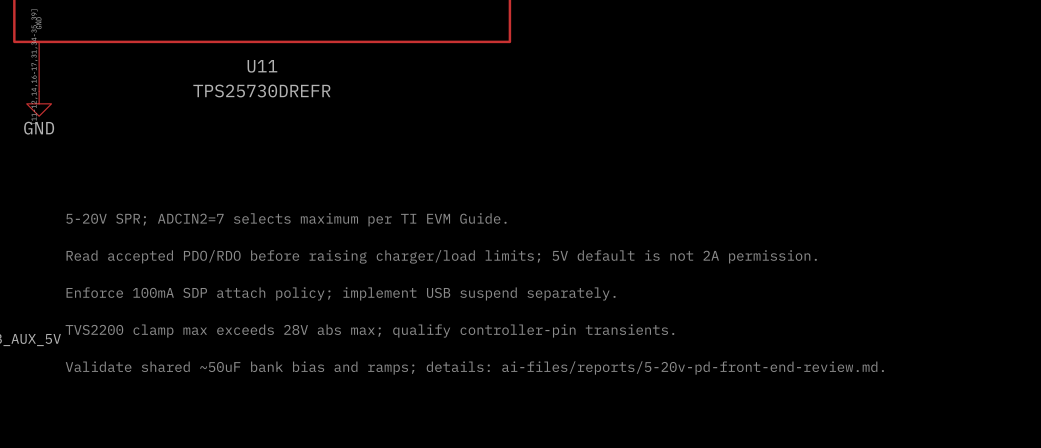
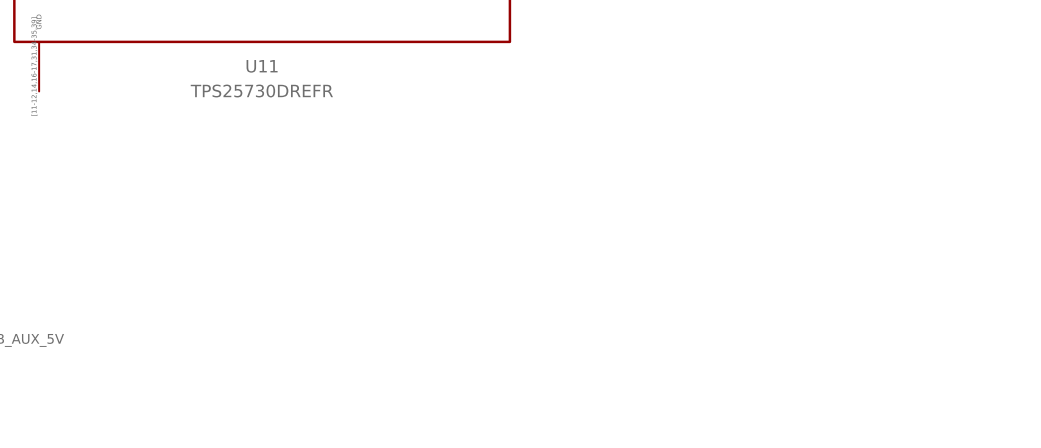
power symbol: GND (39, 103) -> none
text: 5-20V SPR; ADCIN2=7 selects maximum per TI EVM Guide. (286, 219) -> none
text: Read accepted PDO/RDO before raising charger/load limits; 5V default is not 2A permission. (441, 256) -> none
text: Enforce 100mA SDP attach policy; implement USB suspend separately. (341, 293) -> none
text: TVS2200 clamp max exceeds 28V abs max; qualify controller-pin transients. (369, 330) -> none
text: Validate shared ~50uF bank bias and ramps; details: ai-files/reports/5-20v-pd-front-end-review.md. (474, 367) -> none

